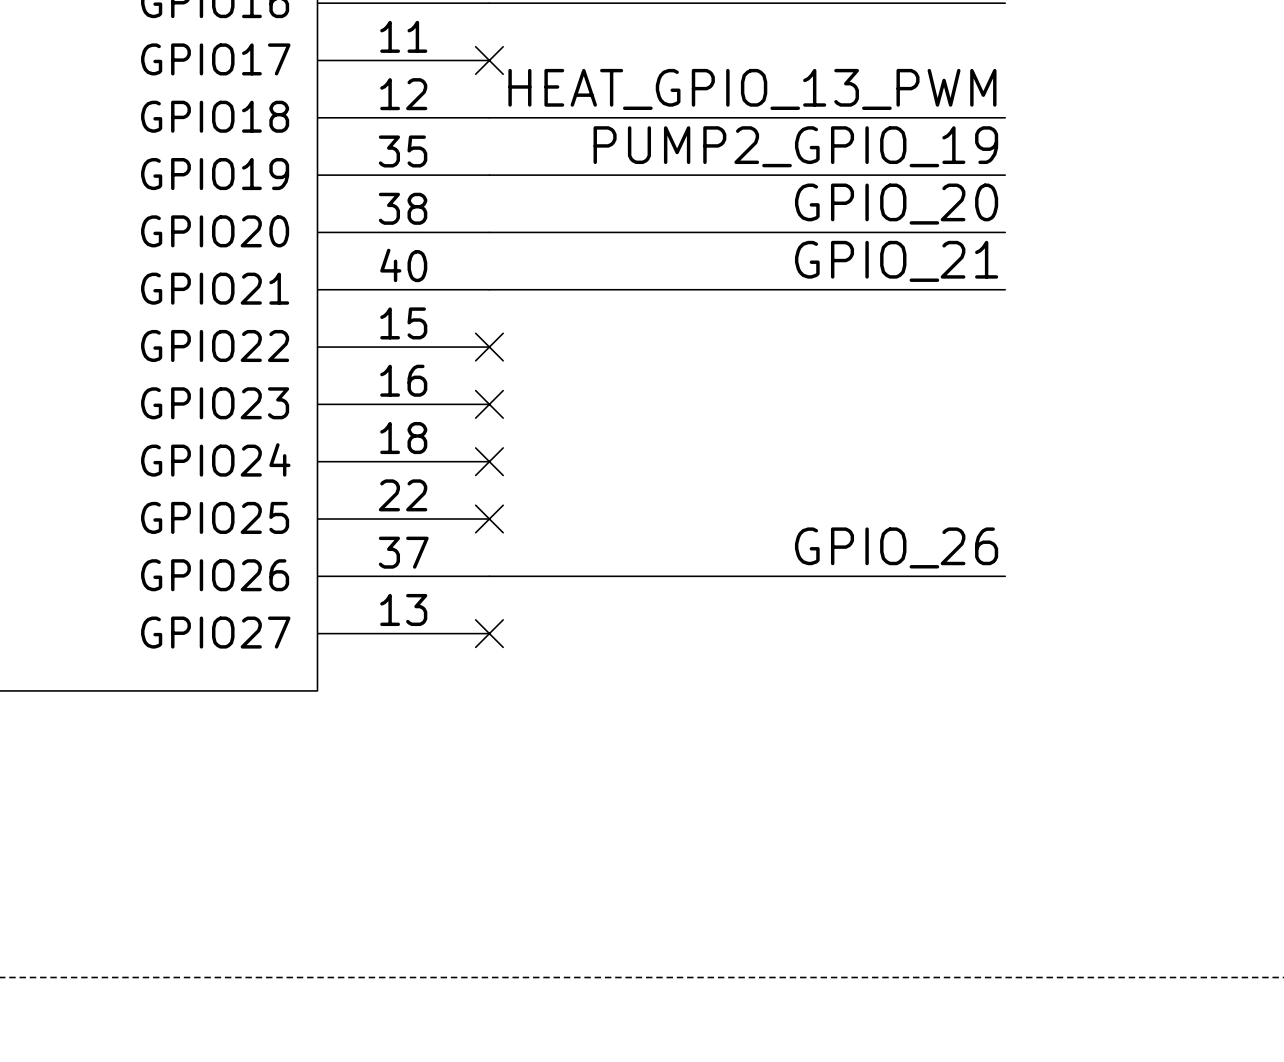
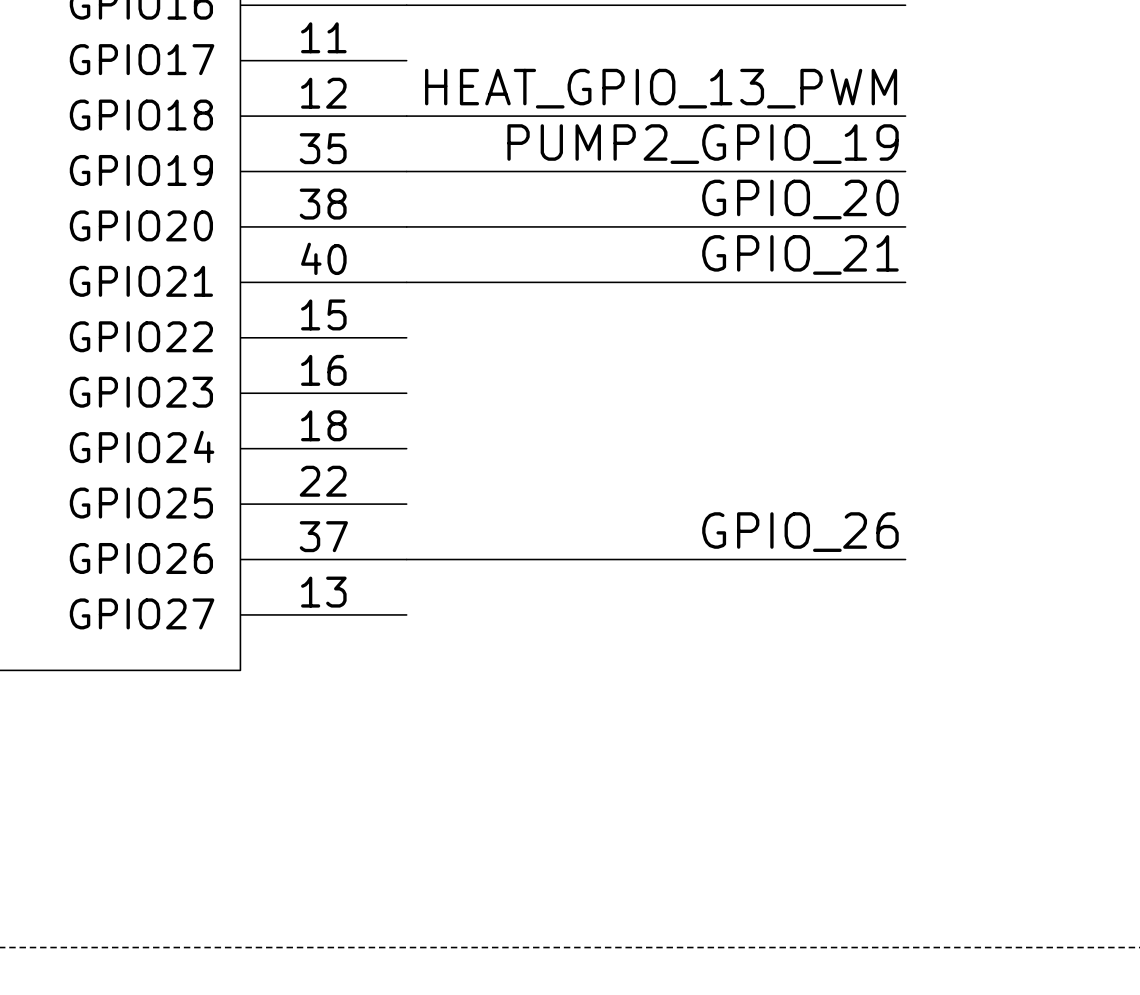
no-connect mark: (489, 60) -> none
no-connect mark: (489, 347) -> none
no-connect mark: (489, 404) -> none
no-connect mark: (489, 461) -> none
no-connect mark: (489, 518) -> none
no-connect mark: (489, 633) -> none

